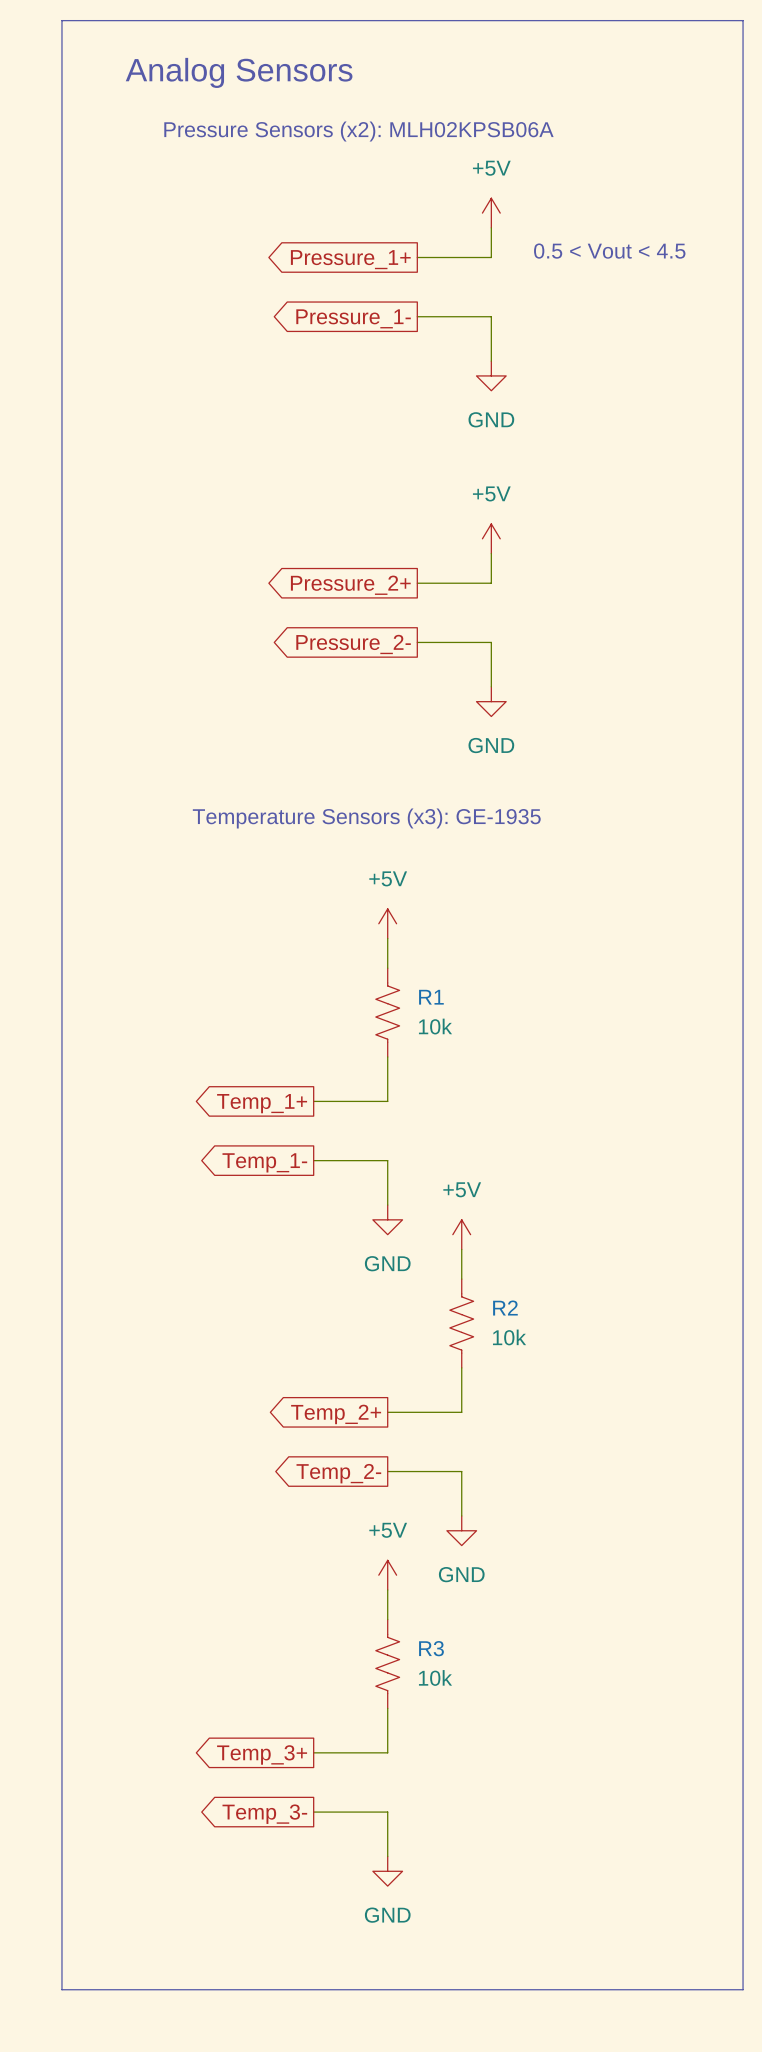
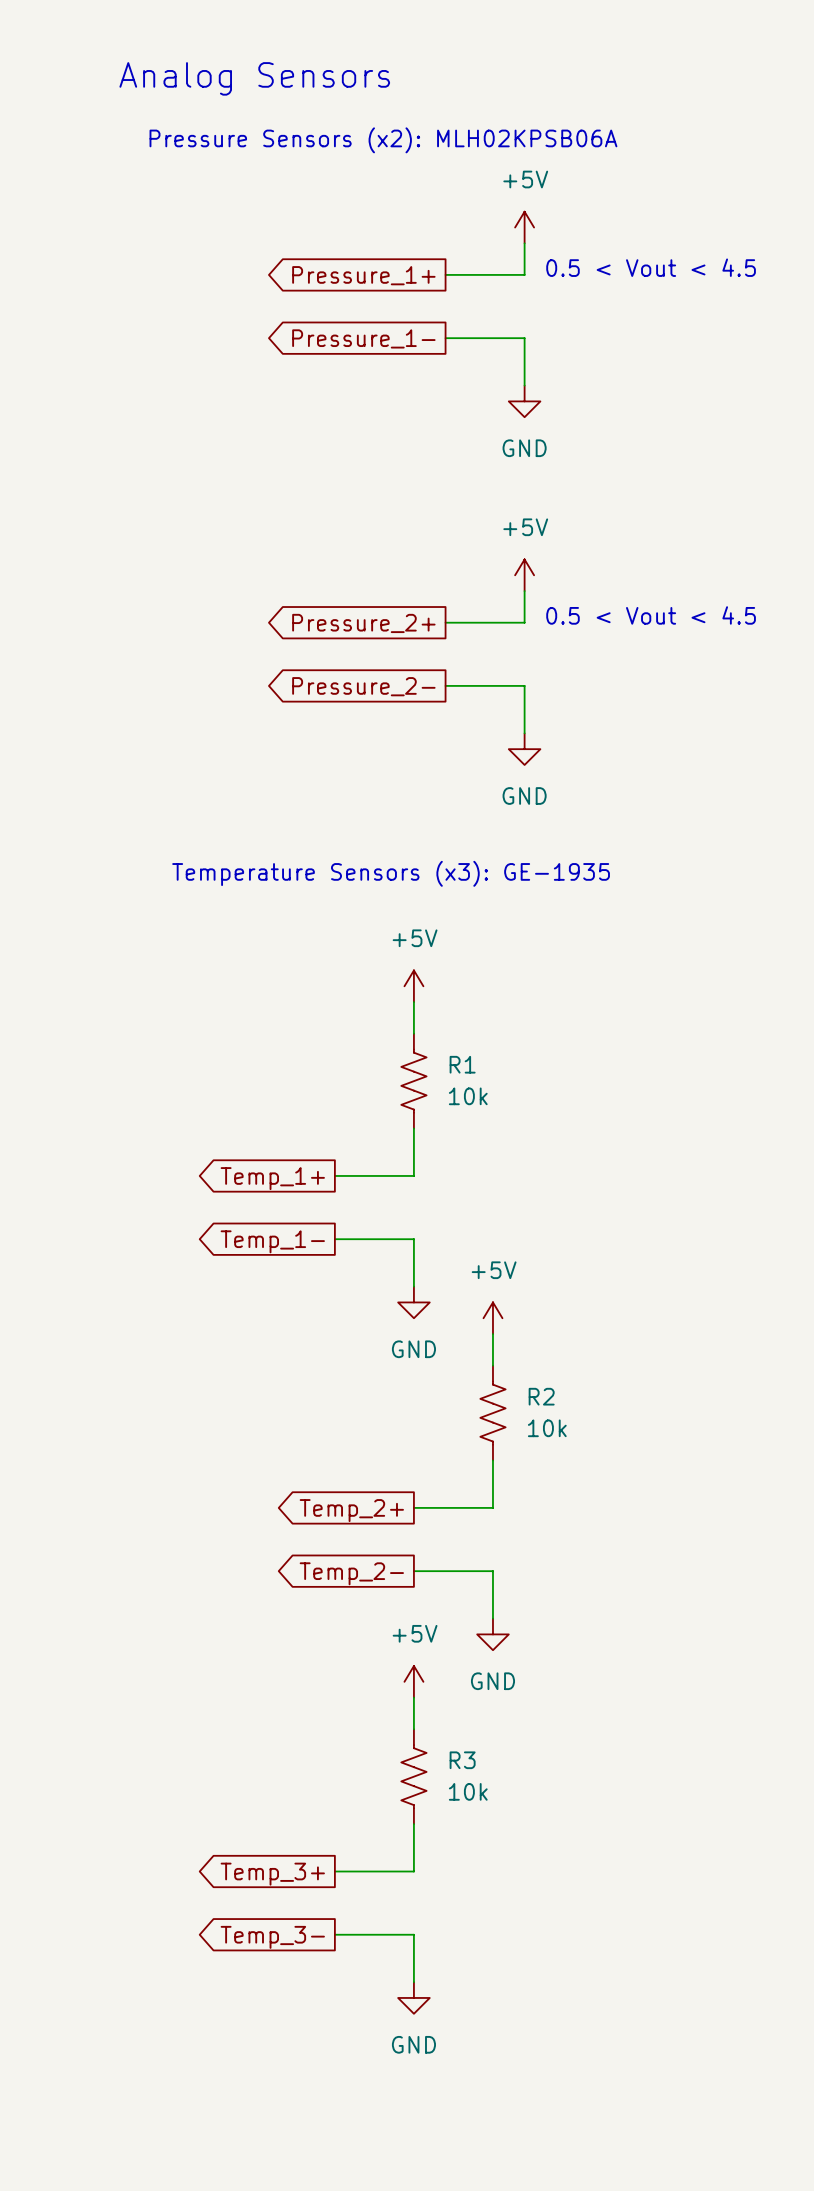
line: (61, 20) (743, 20) (743, 1989) (61, 1989) (61, 20) -> none
text: none -> 0.5 < Vout < 4.5 (651, 615)

